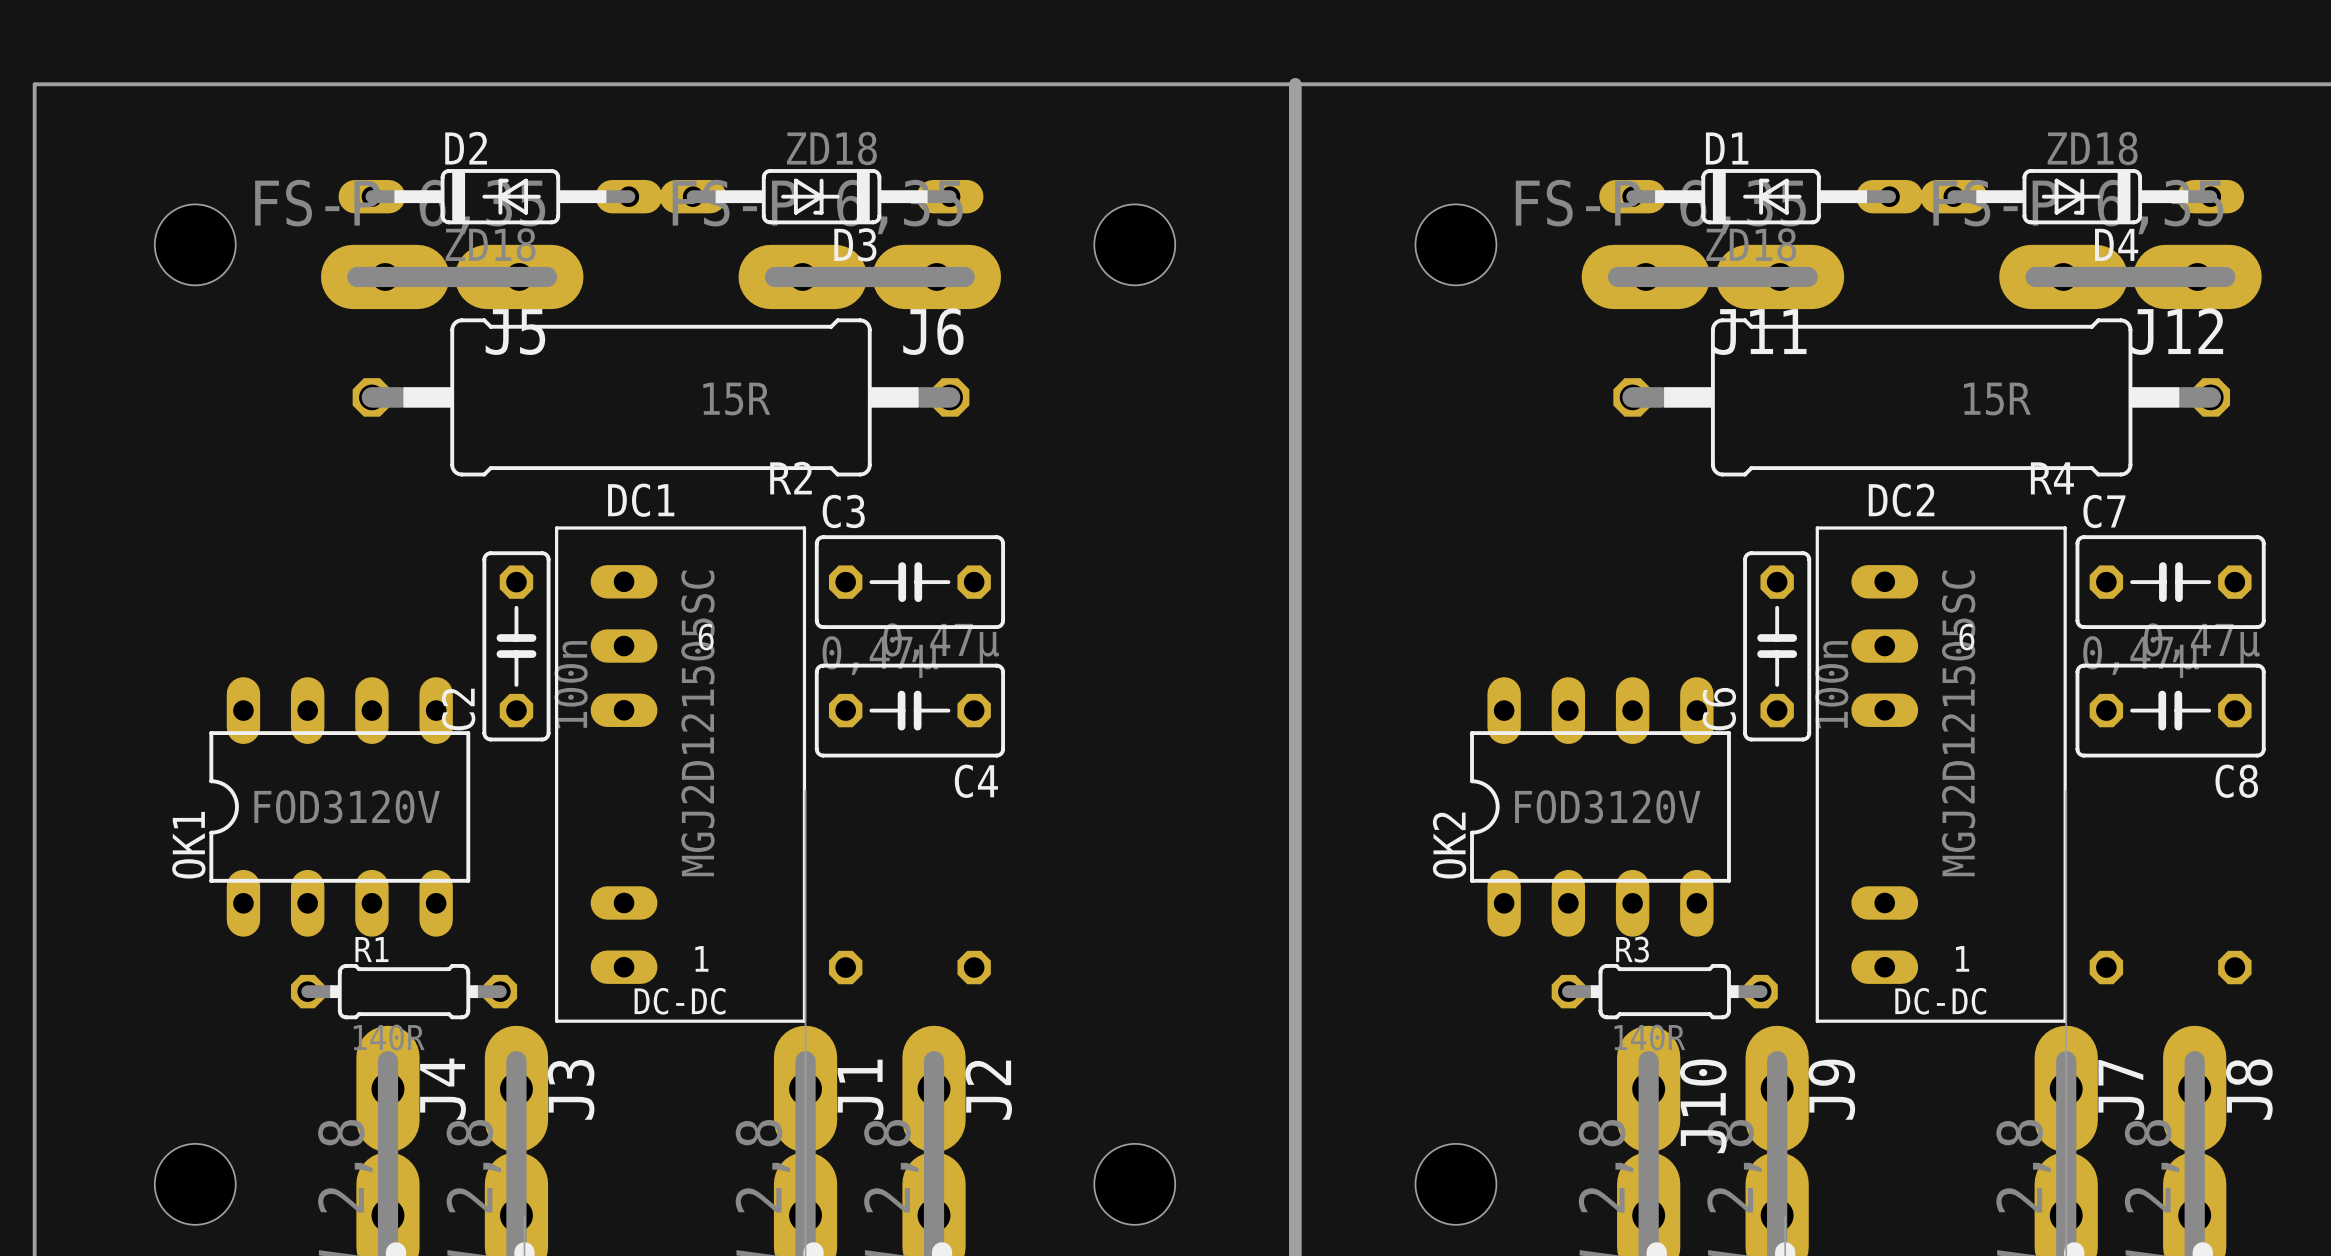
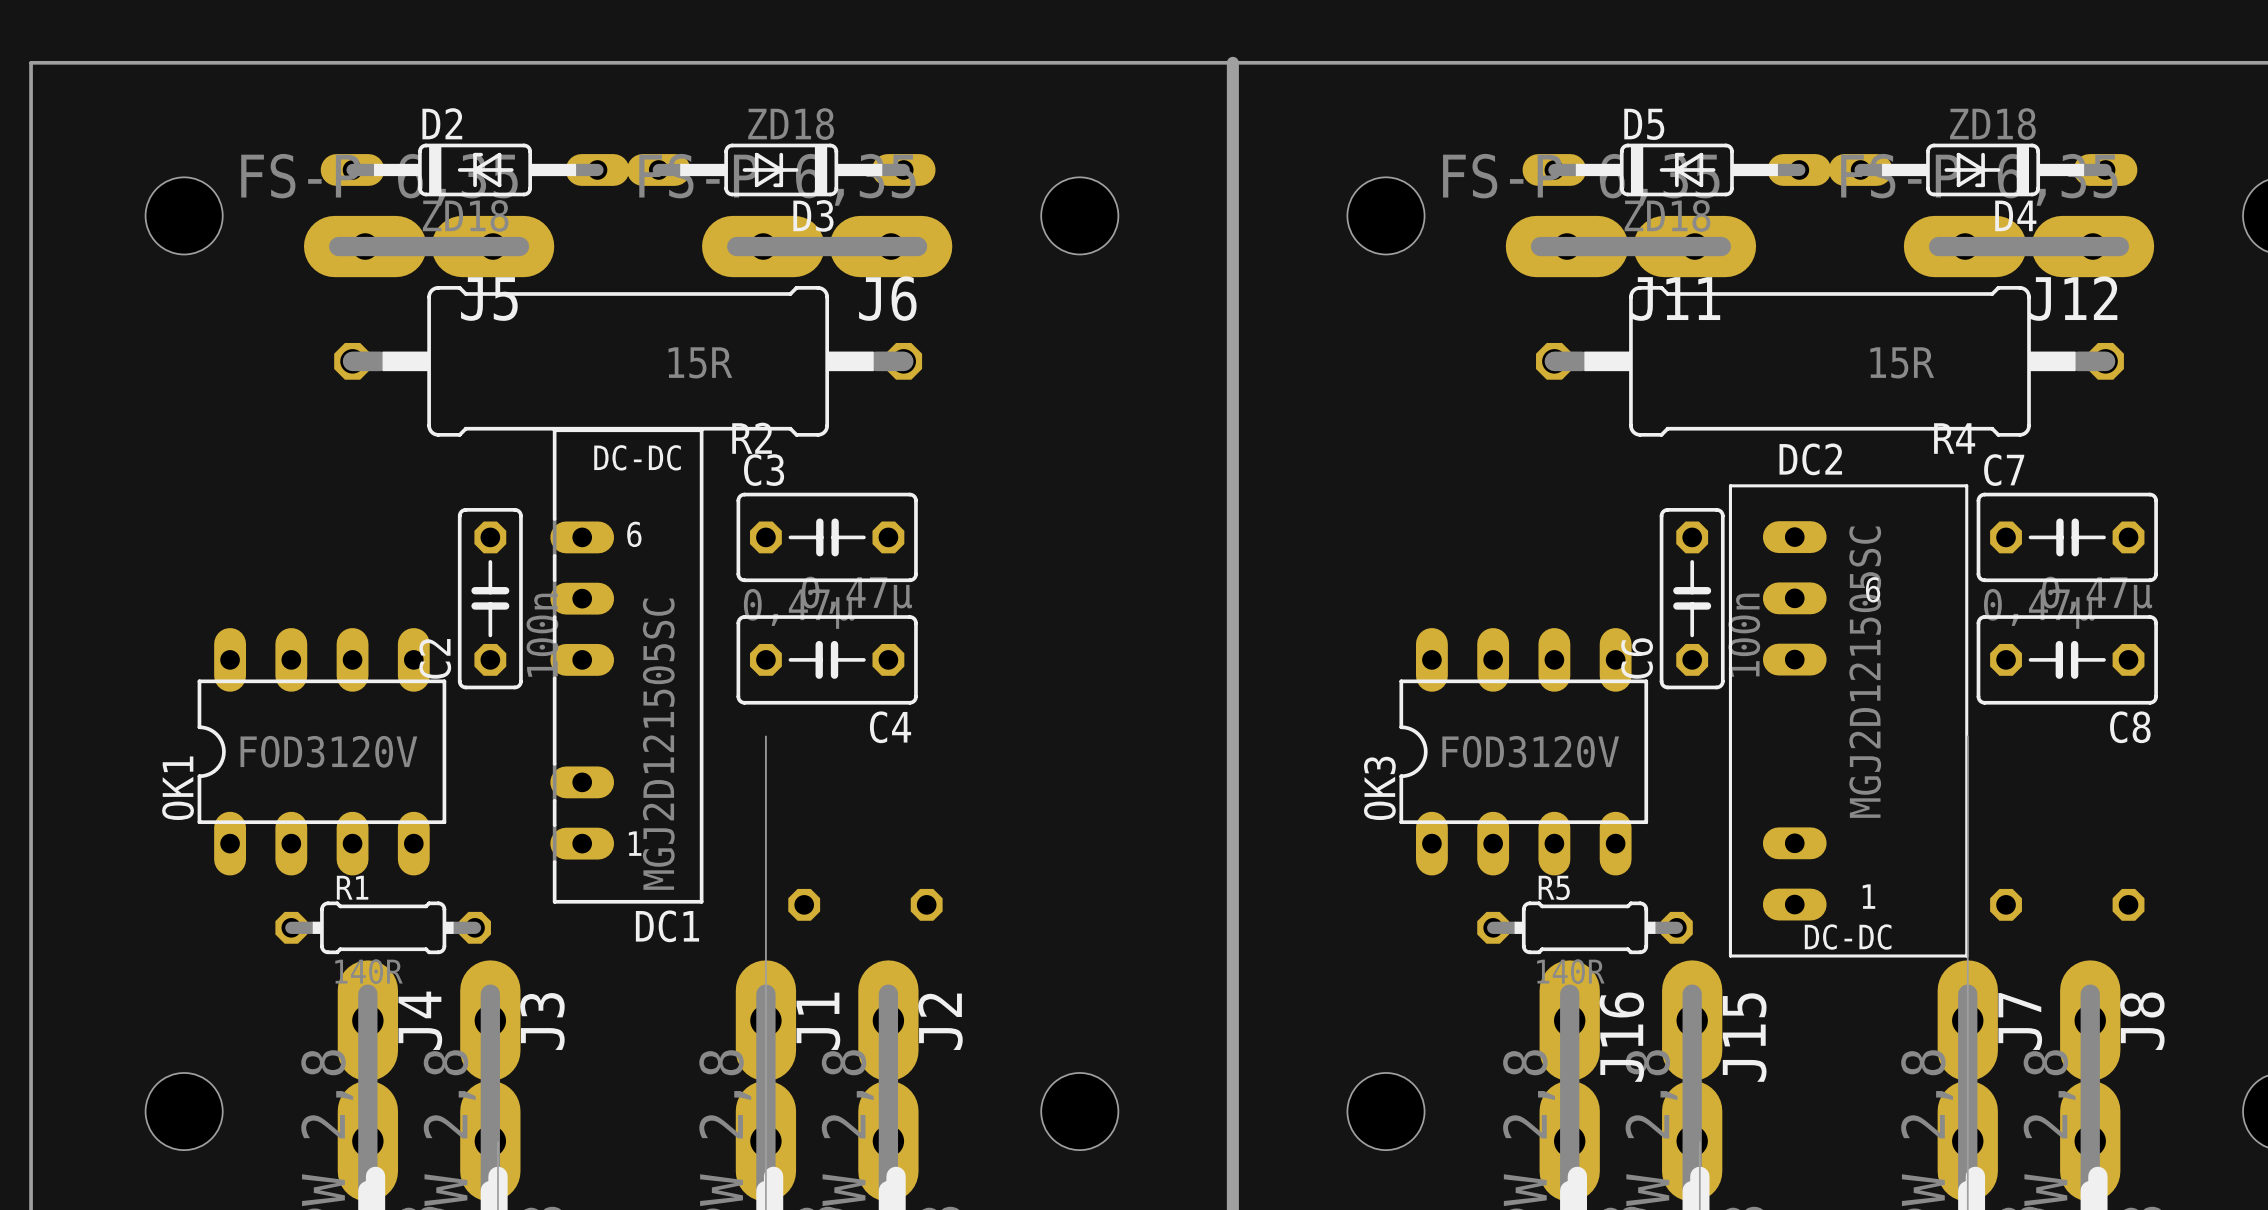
D1 name: D1 (1727, 148) -> D5 (1644, 124)
DC1 name position: DC1 (641, 500) -> DC1 (667, 926)
DC1 footprint: [555, 526, 807, 1023] -> [550, 428, 704, 904]
C3 position: (909, 582) -> (827, 537)
C4 position: (909, 710) -> (827, 659)
DC1 value position: MGJ2D121505SC (697, 723) -> MGJ2D121505SC (658, 744)
OK2 name: OK2 (1449, 845) -> OK3 (1379, 788)
R3 name: R3 (1632, 949) -> R5 (1554, 887)
J9 name: J9 (1831, 1089) -> J15 (1744, 1037)
J10 name: J10 (1703, 1106) -> J16 (1621, 1037)

